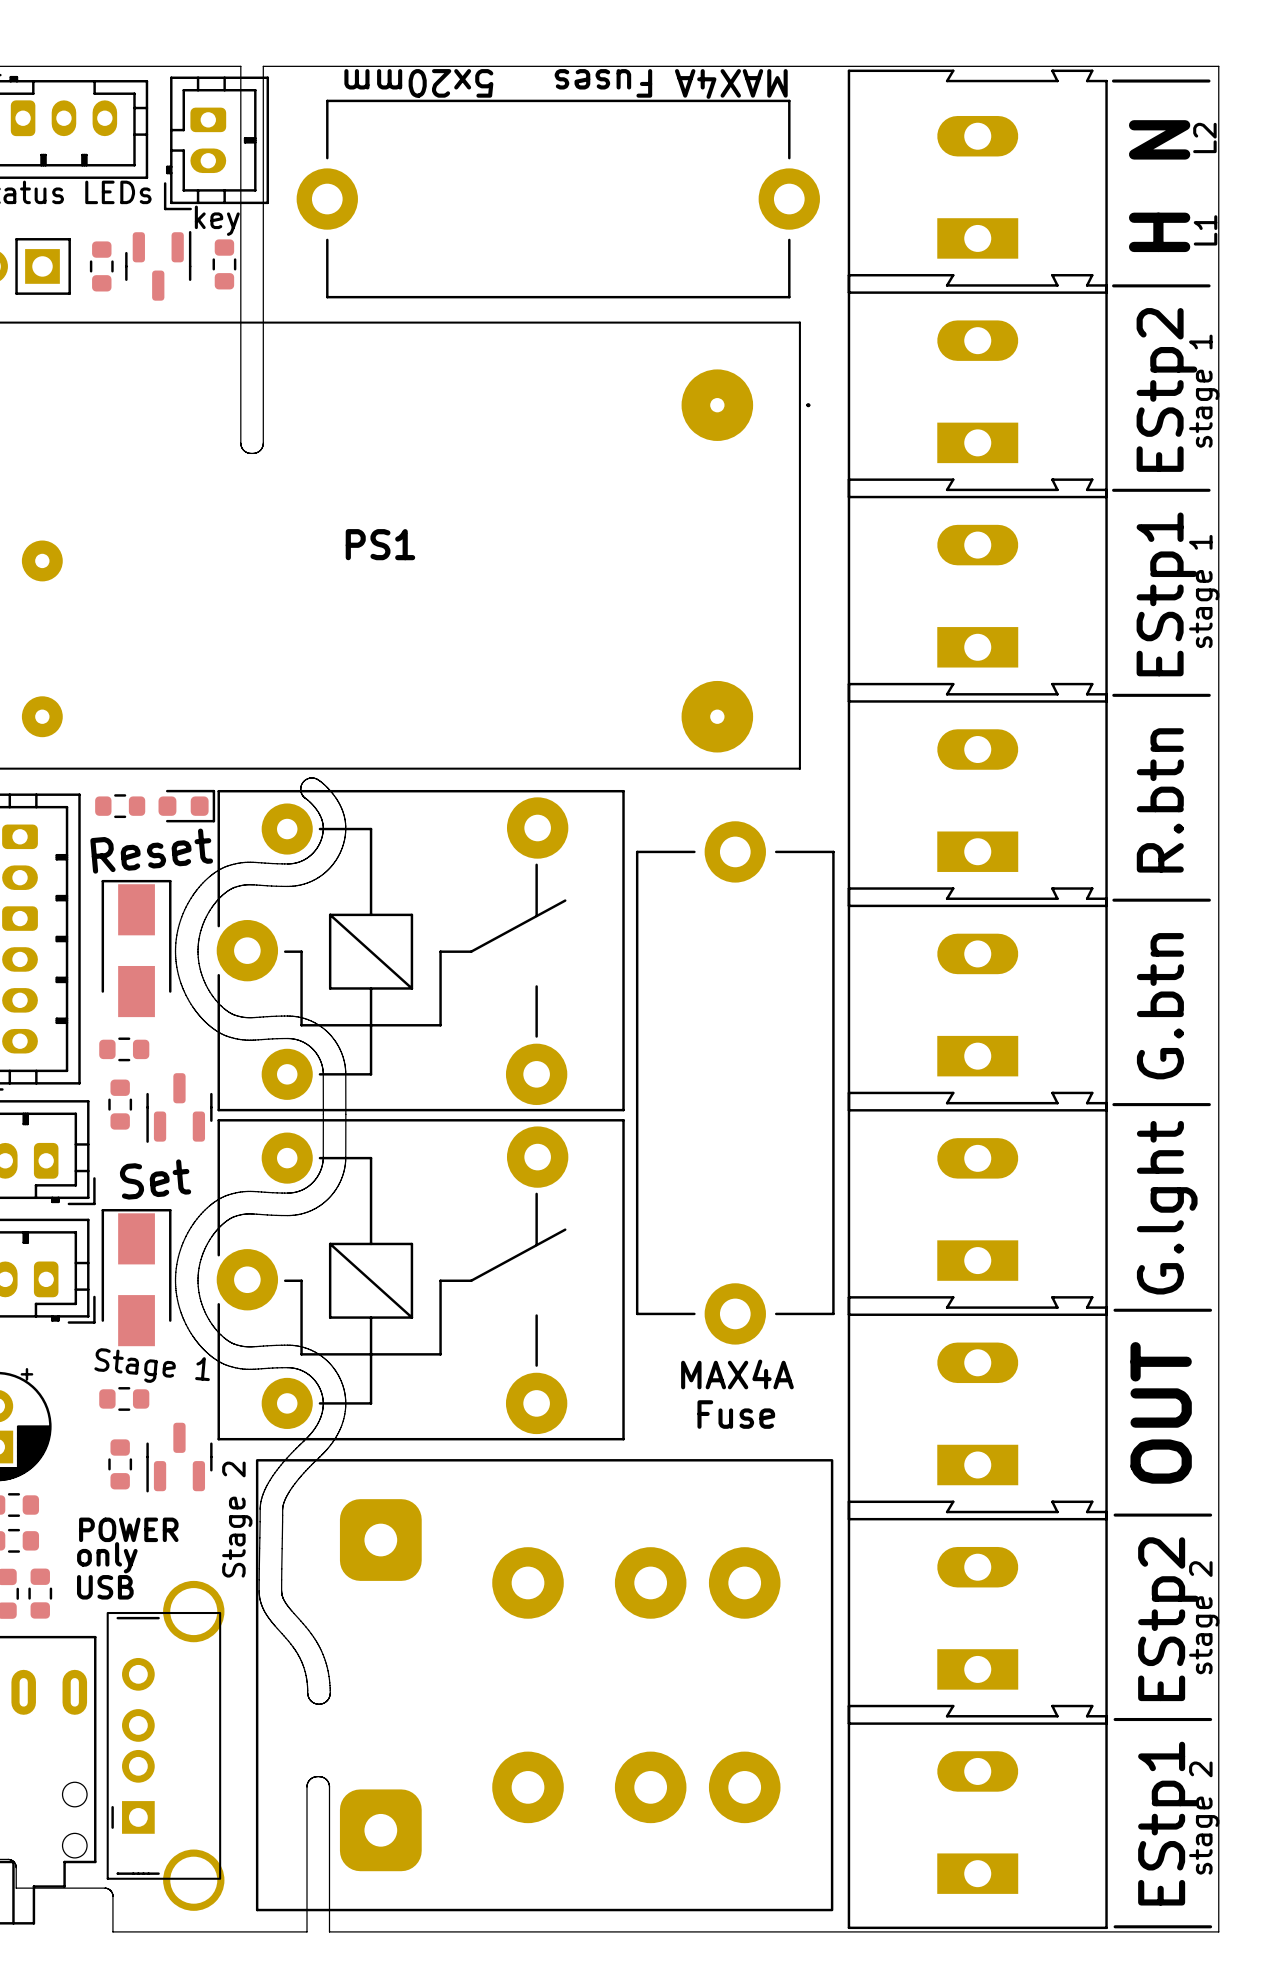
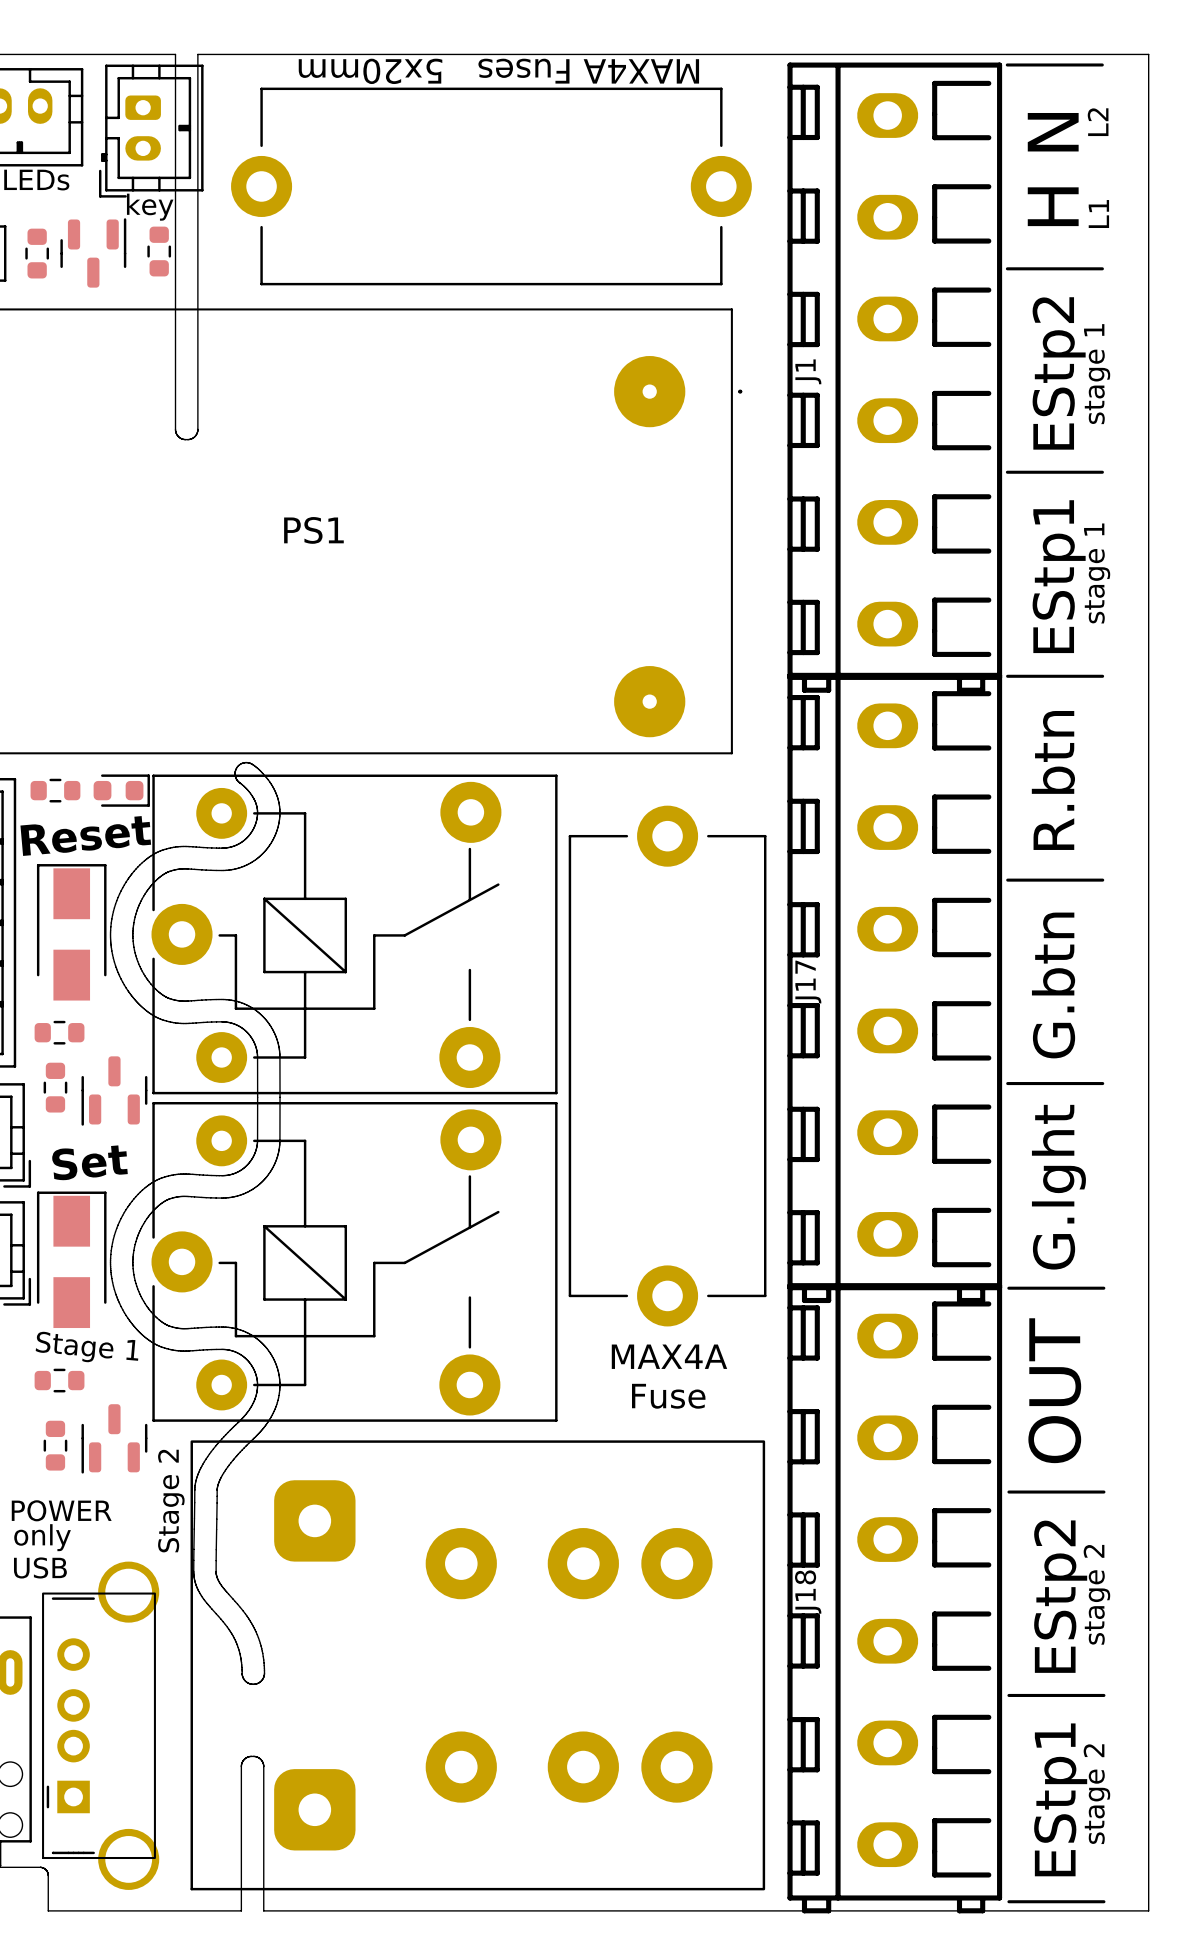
line: (1113, 81) (1208, 81) -> (1007, 64) (1102, 64)
text position: L2 (1204, 137) -> L2 (1098, 122)
part: (977, 181) -> none
text position: H N (1159, 186) -> H N (1053, 169)
text position: L1 (1205, 230) -> L1 (1098, 214)
line: (1113, 285) (1209, 285) -> (1007, 268) (1102, 268)
part: (977, 386) -> none
text position: EStp2 (1166, 389) -> EStp2 (1059, 373)
J1: none -> (894, 377)
text position: stage 1 (1204, 391) -> stage 1 (1097, 374)
line: (1113, 490) (1209, 490) -> (1007, 472) (1102, 472)
part: (977, 590) -> none
text position: stage 1 (1204, 591) -> stage 1 (1097, 573)
text position: EStp1 (1166, 594) -> EStp1 (1059, 576)
line: (1113, 695) (1209, 695) -> (1007, 676) (1102, 676)
part: (977, 794) -> none
text position: R.btn (1160, 800) -> R.btn (1053, 780)
line: (1113, 900) (1209, 900) -> (1007, 880) (1102, 880)
part: (977, 999) -> none
J17: none -> (894, 987)
text position: G.btn (1160, 1006) -> G.btn (1053, 985)
line: (1113, 1104) (1209, 1104) -> (1007, 1083) (1102, 1083)
part: (977, 1203) -> none
text position: G.lght (1167, 1207) -> G.lght (1058, 1187)
line: (1115, 1310) (1210, 1310) -> (1008, 1288) (1103, 1288)
part: (977, 1408) -> none
text position: OUT (1161, 1412) -> OUT (1054, 1390)
line: (1115, 1515) (1210, 1515) -> (1008, 1492) (1103, 1492)
part: (977, 1612) -> none
J18: none -> (894, 1598)
text position: stage 2 (1204, 1617) -> stage 2 (1096, 1594)
text position: EStp2 (1168, 1619) -> EStp2 (1060, 1596)
line: (1115, 1719) (1210, 1719) -> (1008, 1695) (1103, 1695)
part: (977, 1816) -> none
text position: stage 2 (1204, 1818) -> stage 2 (1096, 1794)
text position: EStp1 (1168, 1823) -> EStp1 (1060, 1799)
line: (1115, 1926) (1210, 1926) -> (1008, 1901) (1103, 1901)

